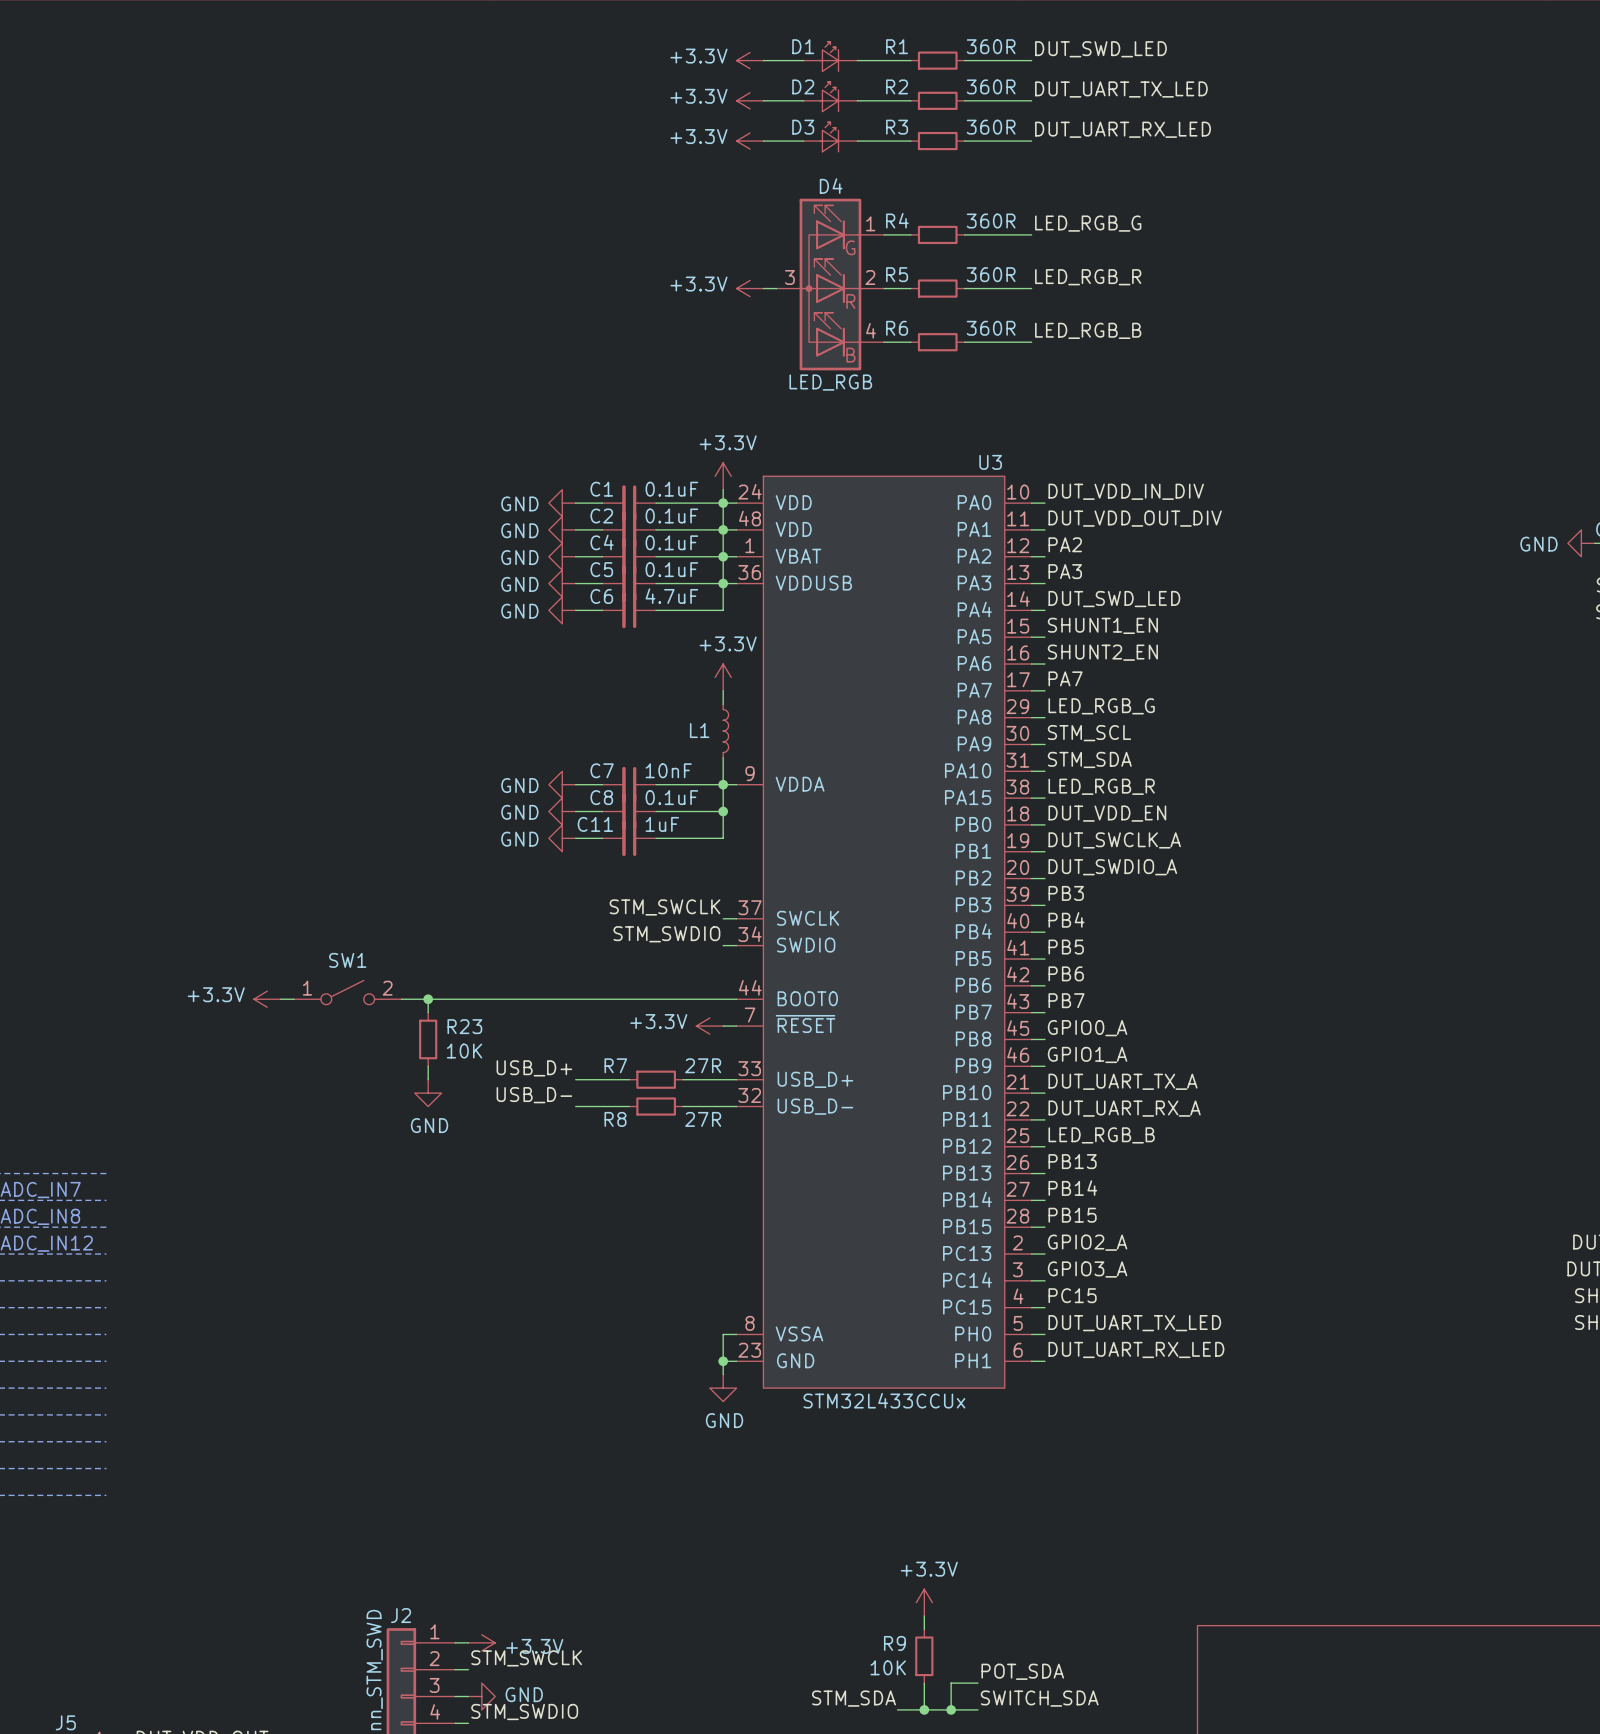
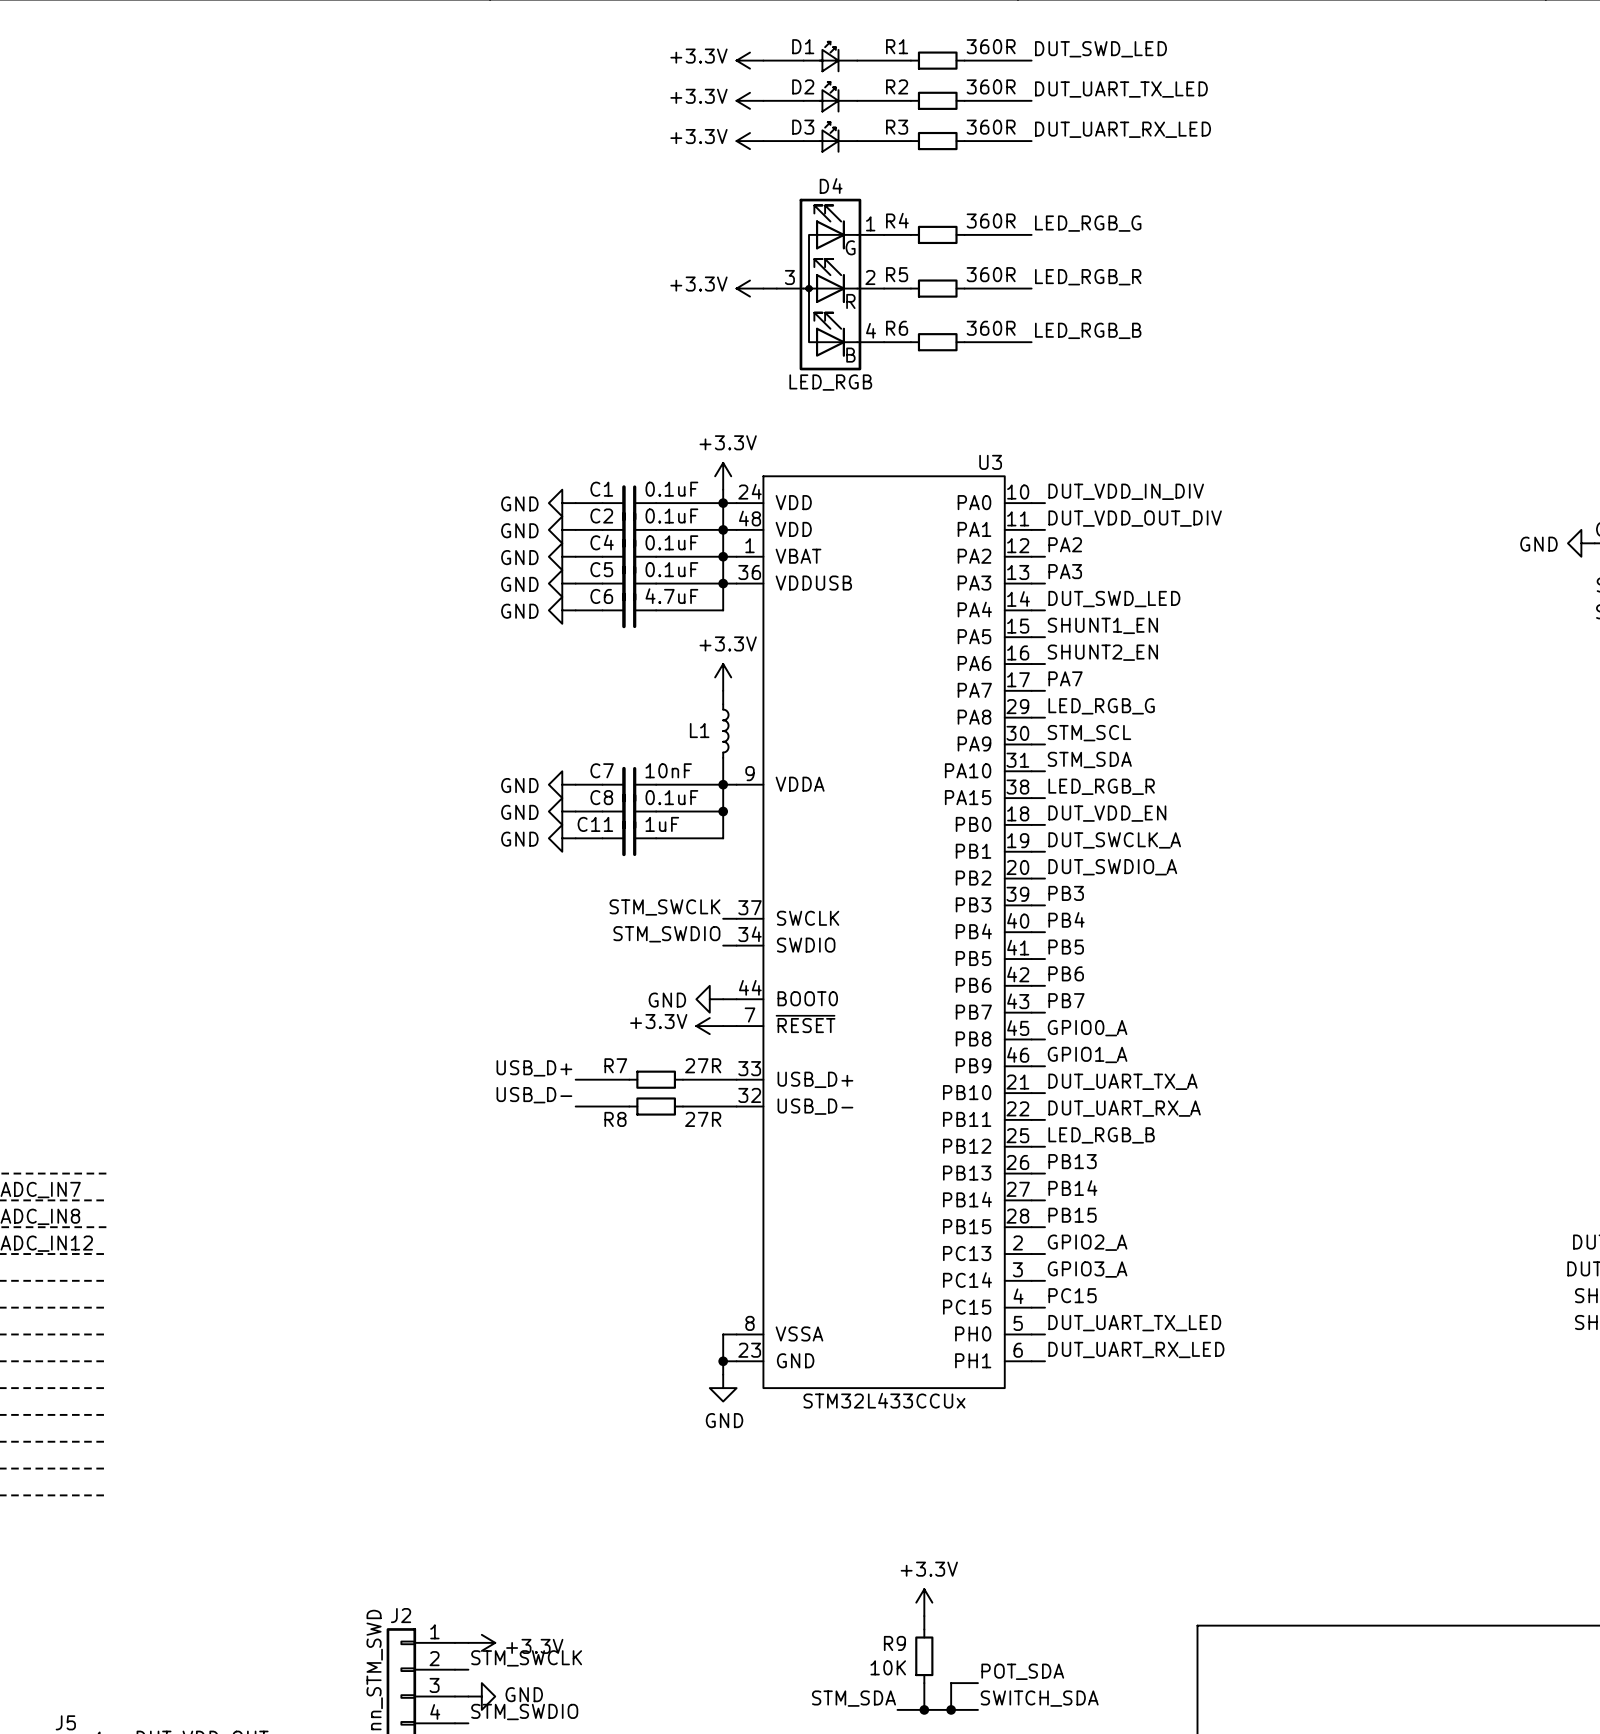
SW1: (347, 992) -> none
power symbol: +3.3V (267, 999) -> none
wire: (280, 999) (294, 999) -> none
wire: (401, 999) (723, 999) -> none
wire: (428, 999) (428, 1012) -> none
junction: (428, 999) -> none
power symbol: none -> GND (709, 999)
R23: 10K (428, 1039) -> none
wire: (428, 1066) (428, 1079) -> none
power symbol: GND (428, 1093) -> none

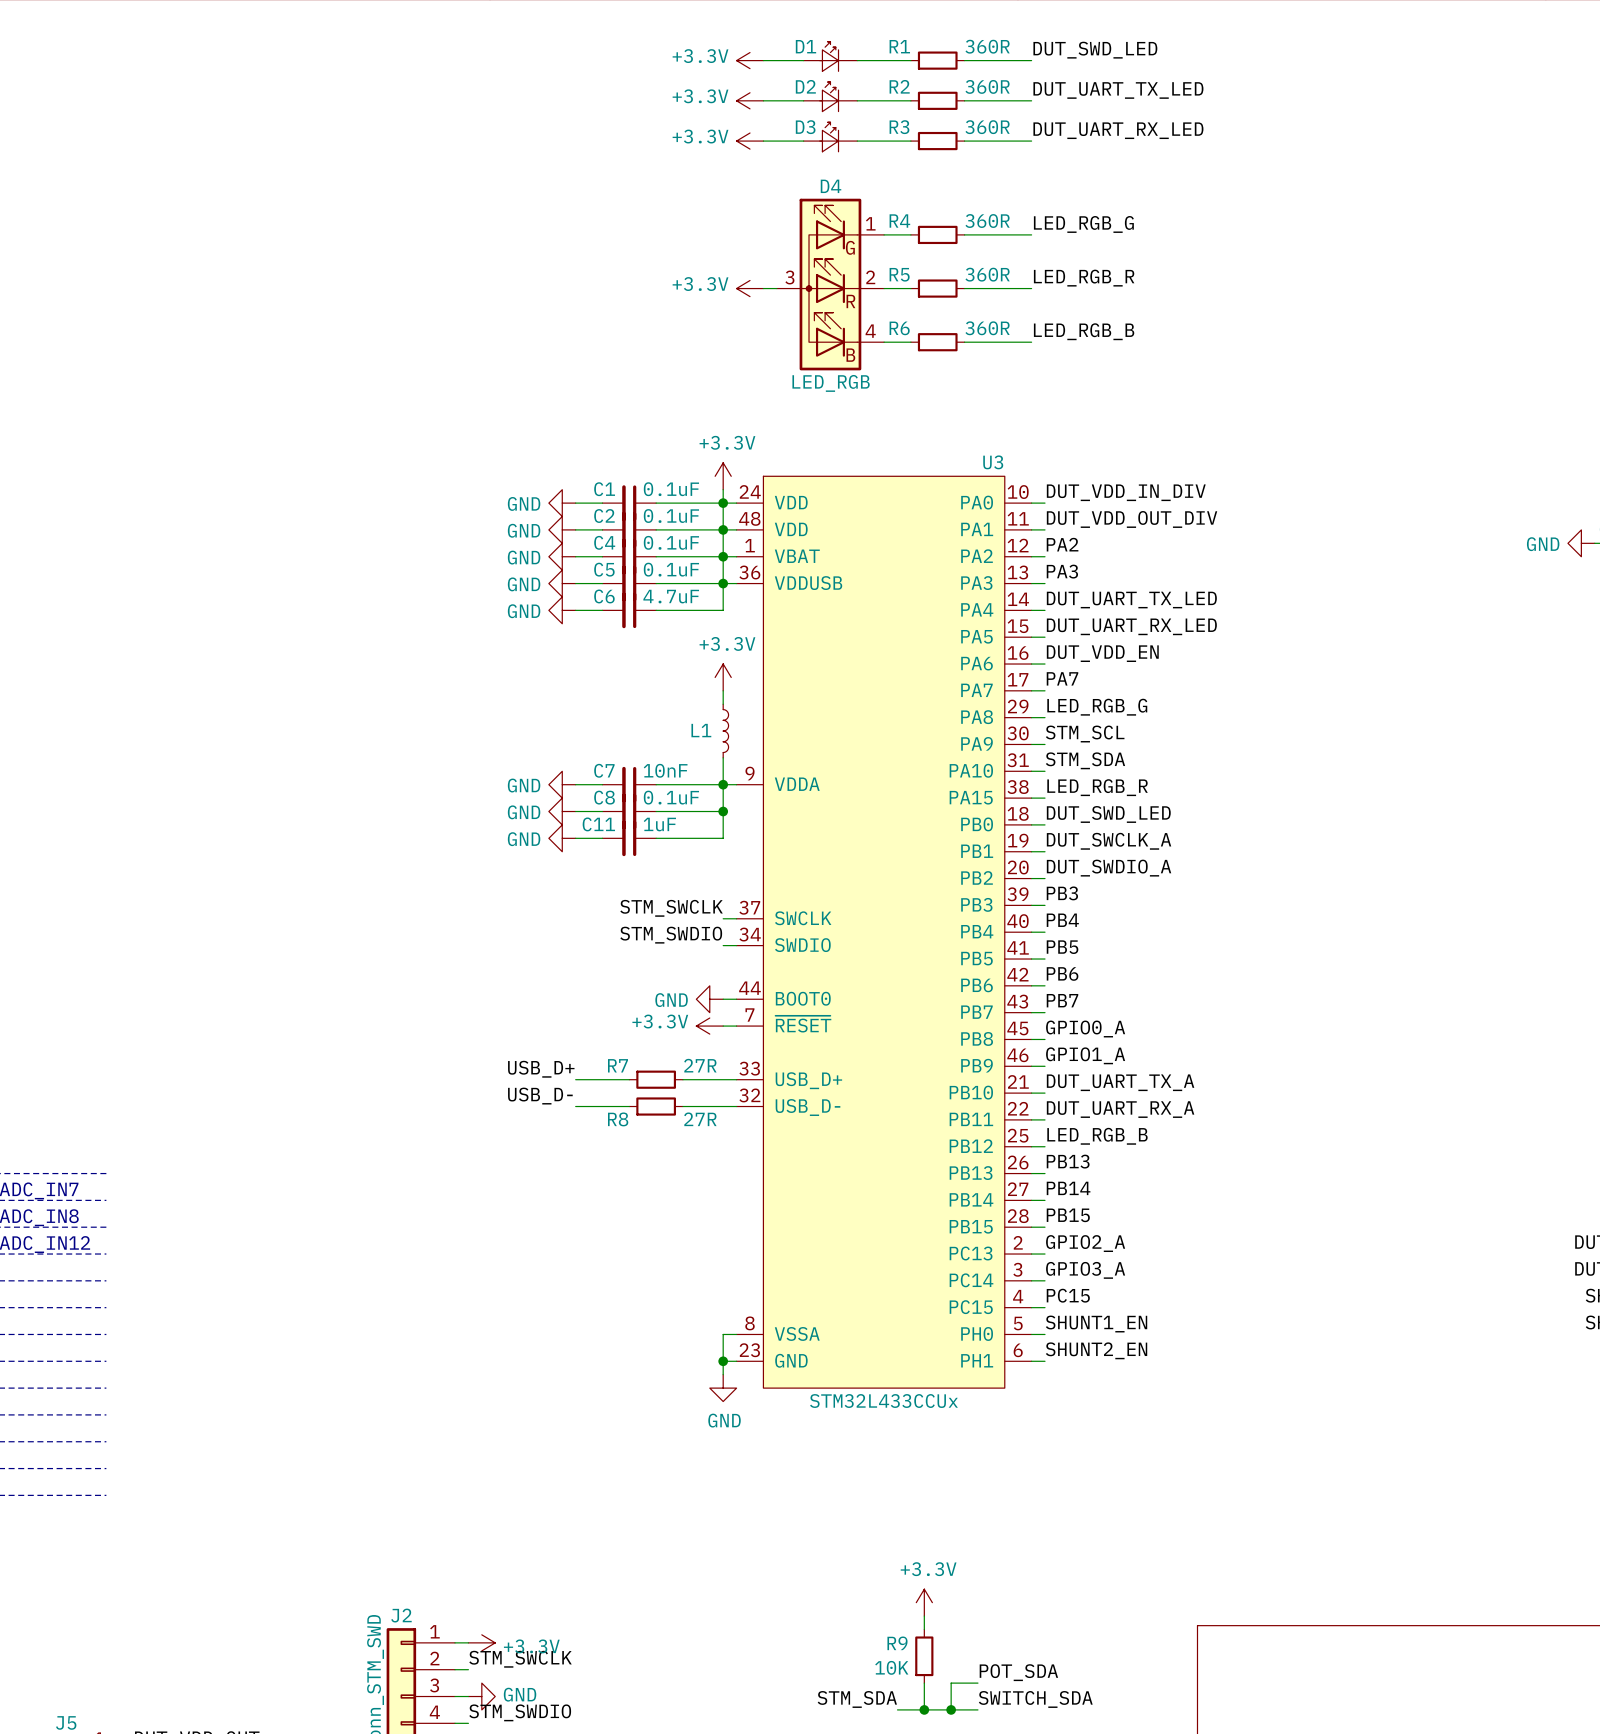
label: DUT_SWD_LED (1114, 599) -> DUT_UART_TX_LED (1131, 600)
label: SHUNT1_EN (1102, 625) -> DUT_UART_RX_LED (1131, 626)
label: SHUNT2_EN (1102, 652) -> DUT_VDD_EN (1102, 653)
label: DUT_VDD_EN (1107, 813) -> DUT_SWD_LED (1108, 814)
label: DUT_UART_TX_LED (1134, 1323) -> SHUNT1_EN (1096, 1324)
label: DUT_UART_RX_LED (1136, 1349) -> SHUNT2_EN (1096, 1350)

